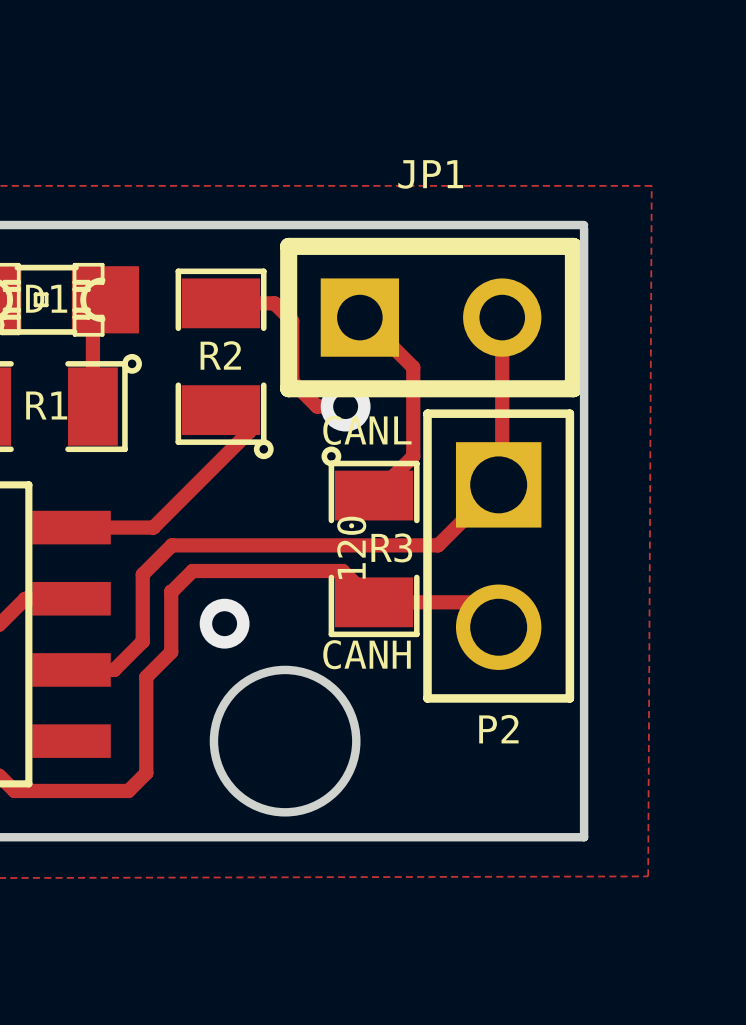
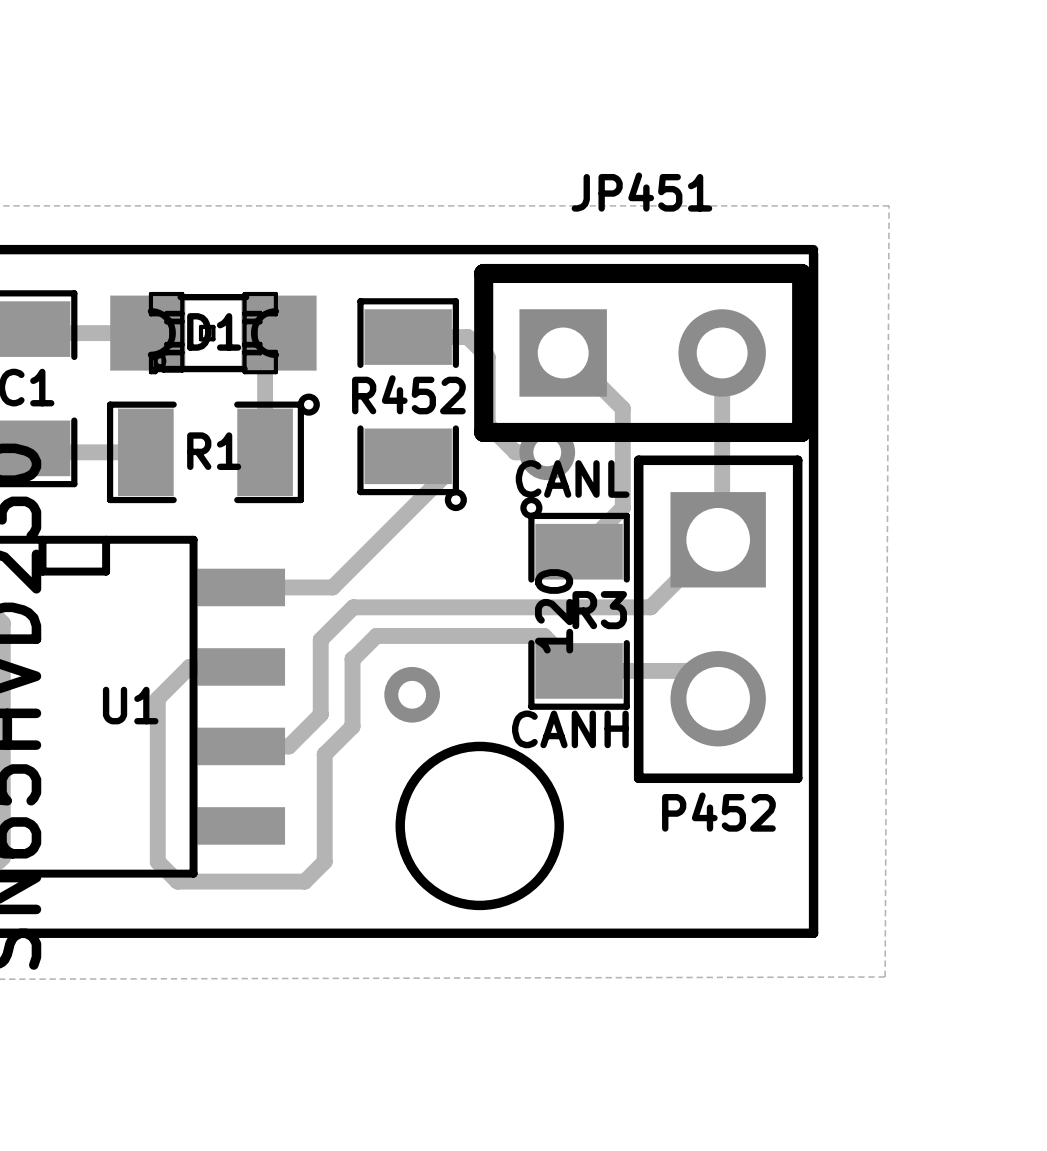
JP1 name: JP1 (430, 174) -> JP451 (641, 192)
R2 name: R2 (220, 355) -> R452 (408, 394)
P2 name: P2 (498, 729) -> P452 (718, 812)

